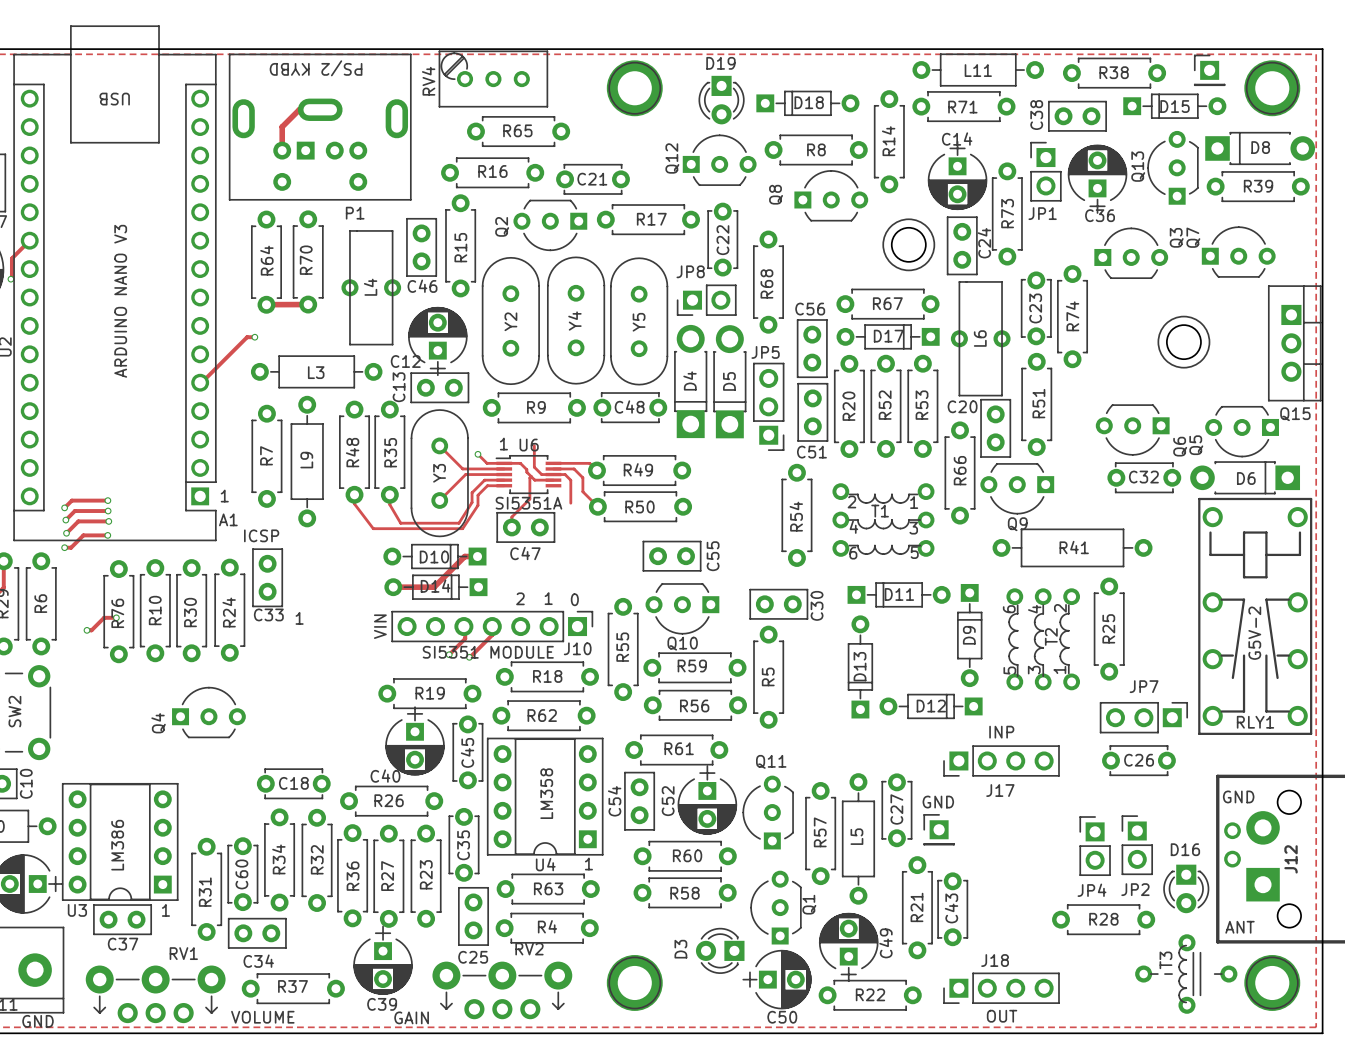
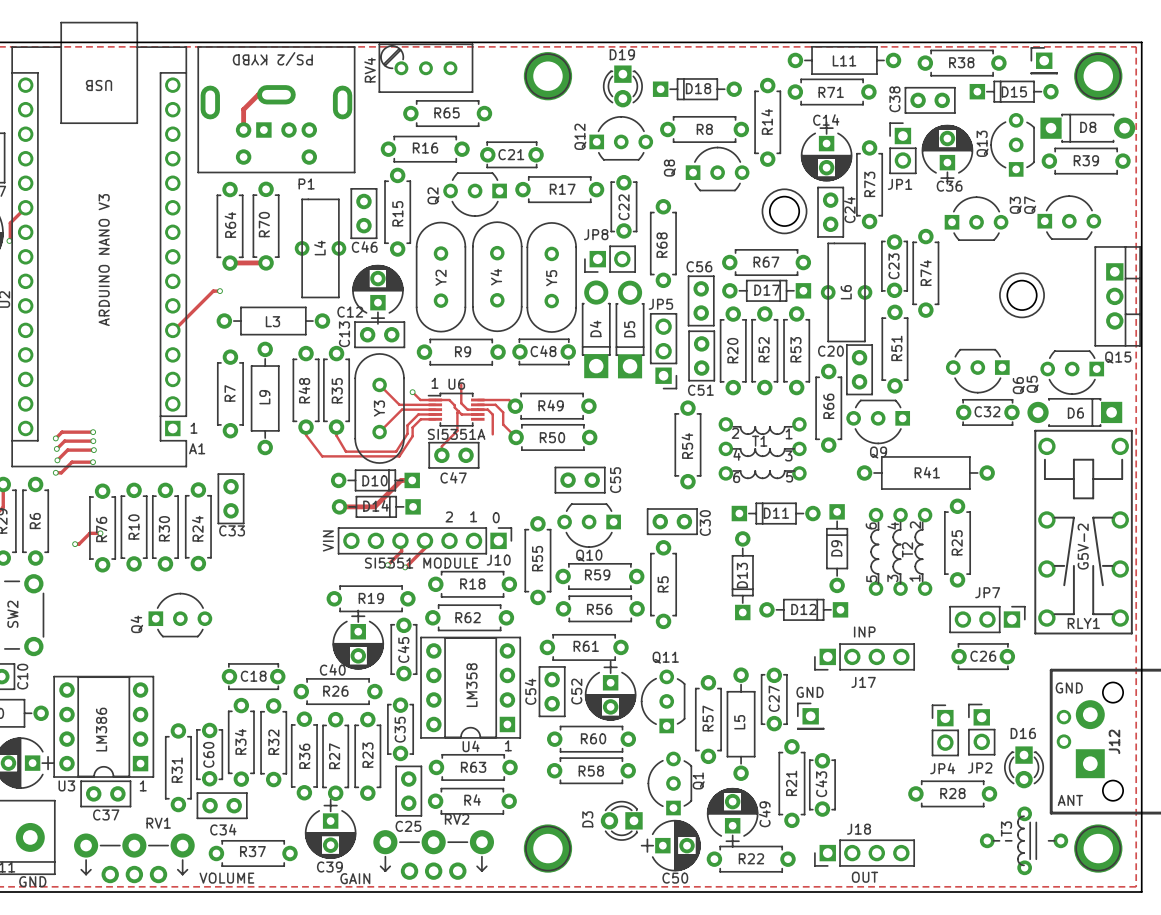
text: ICSP (261, 535) -> none
text: 1 (299, 618) -> none

